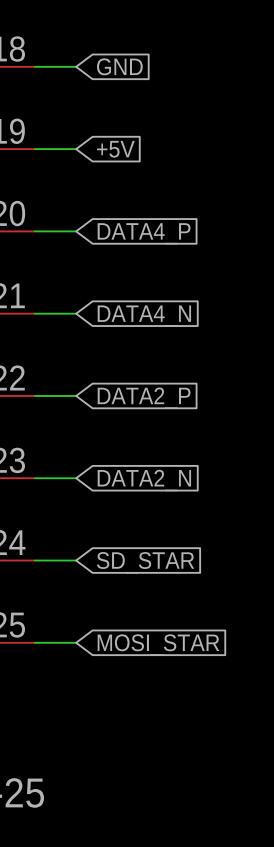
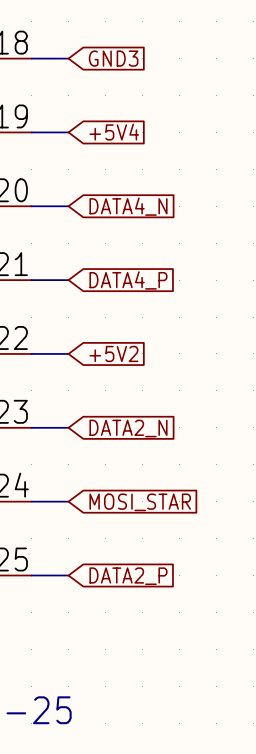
global label: GND (119, 66) -> GND3 (113, 58)
global label: +5V (115, 149) -> +5V4 (114, 132)
global label: DATA4_P (144, 233) -> DATA4_N (128, 206)
global label: DATA4_N (144, 316) -> DATA4_P (128, 280)
global label: DATA2_P (144, 398) -> +5V2 (113, 353)
global label: SD_STAR (145, 562) -> MOSI_STAR (140, 502)
global label: MOSI_STAR (158, 645) -> DATA2_P (128, 576)

